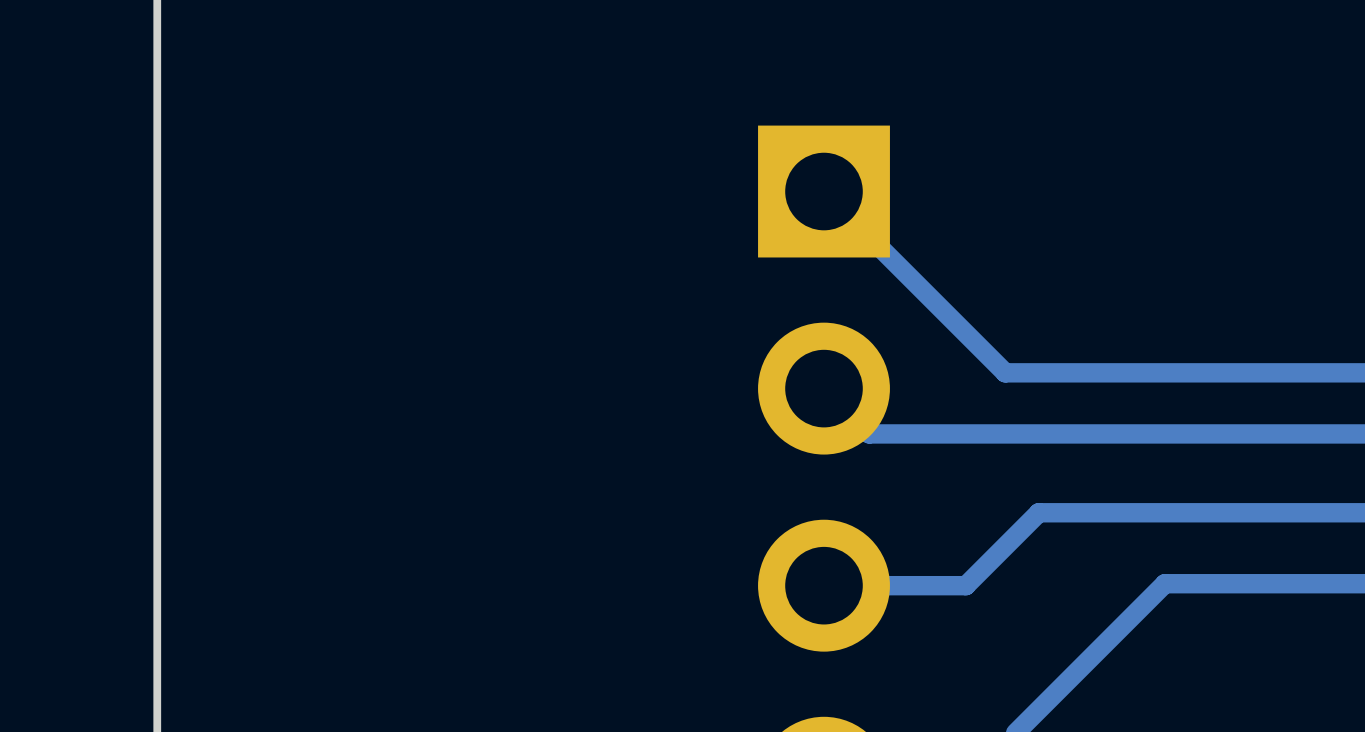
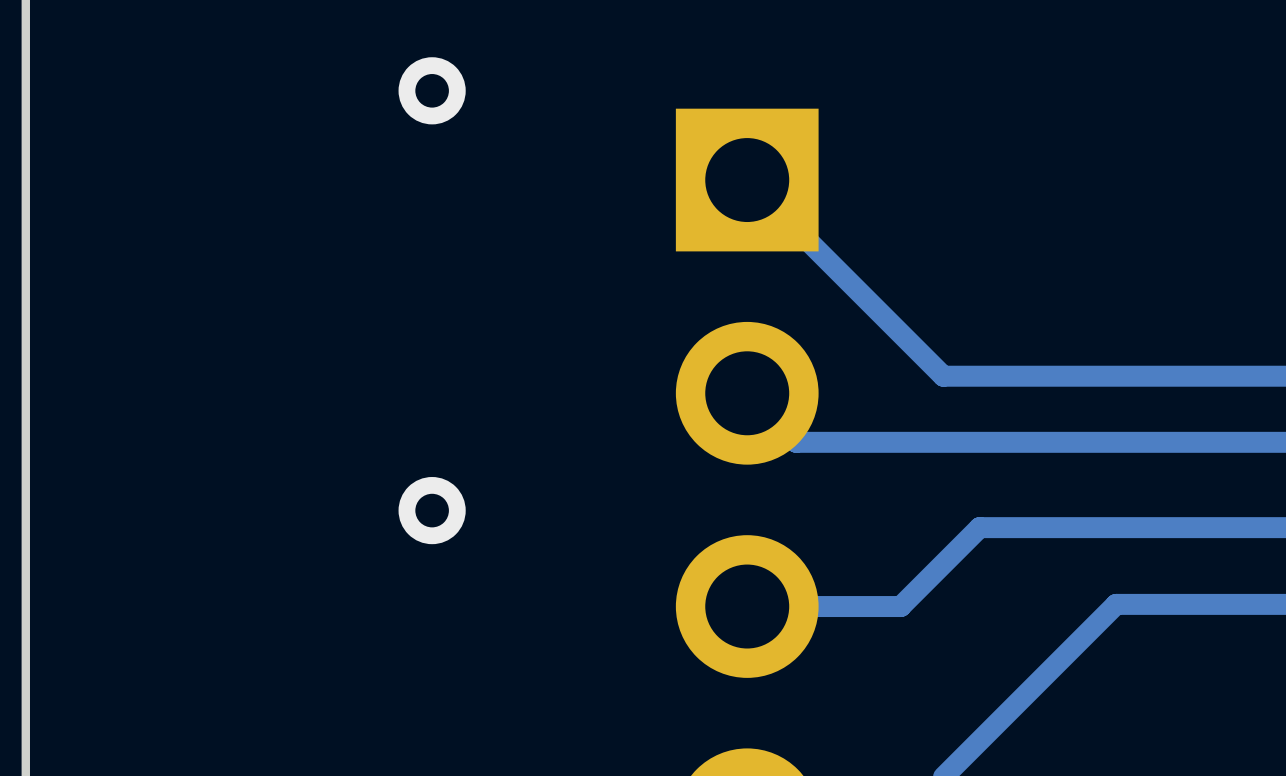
via: none -> (432, 90)
via: none -> (432, 510)

